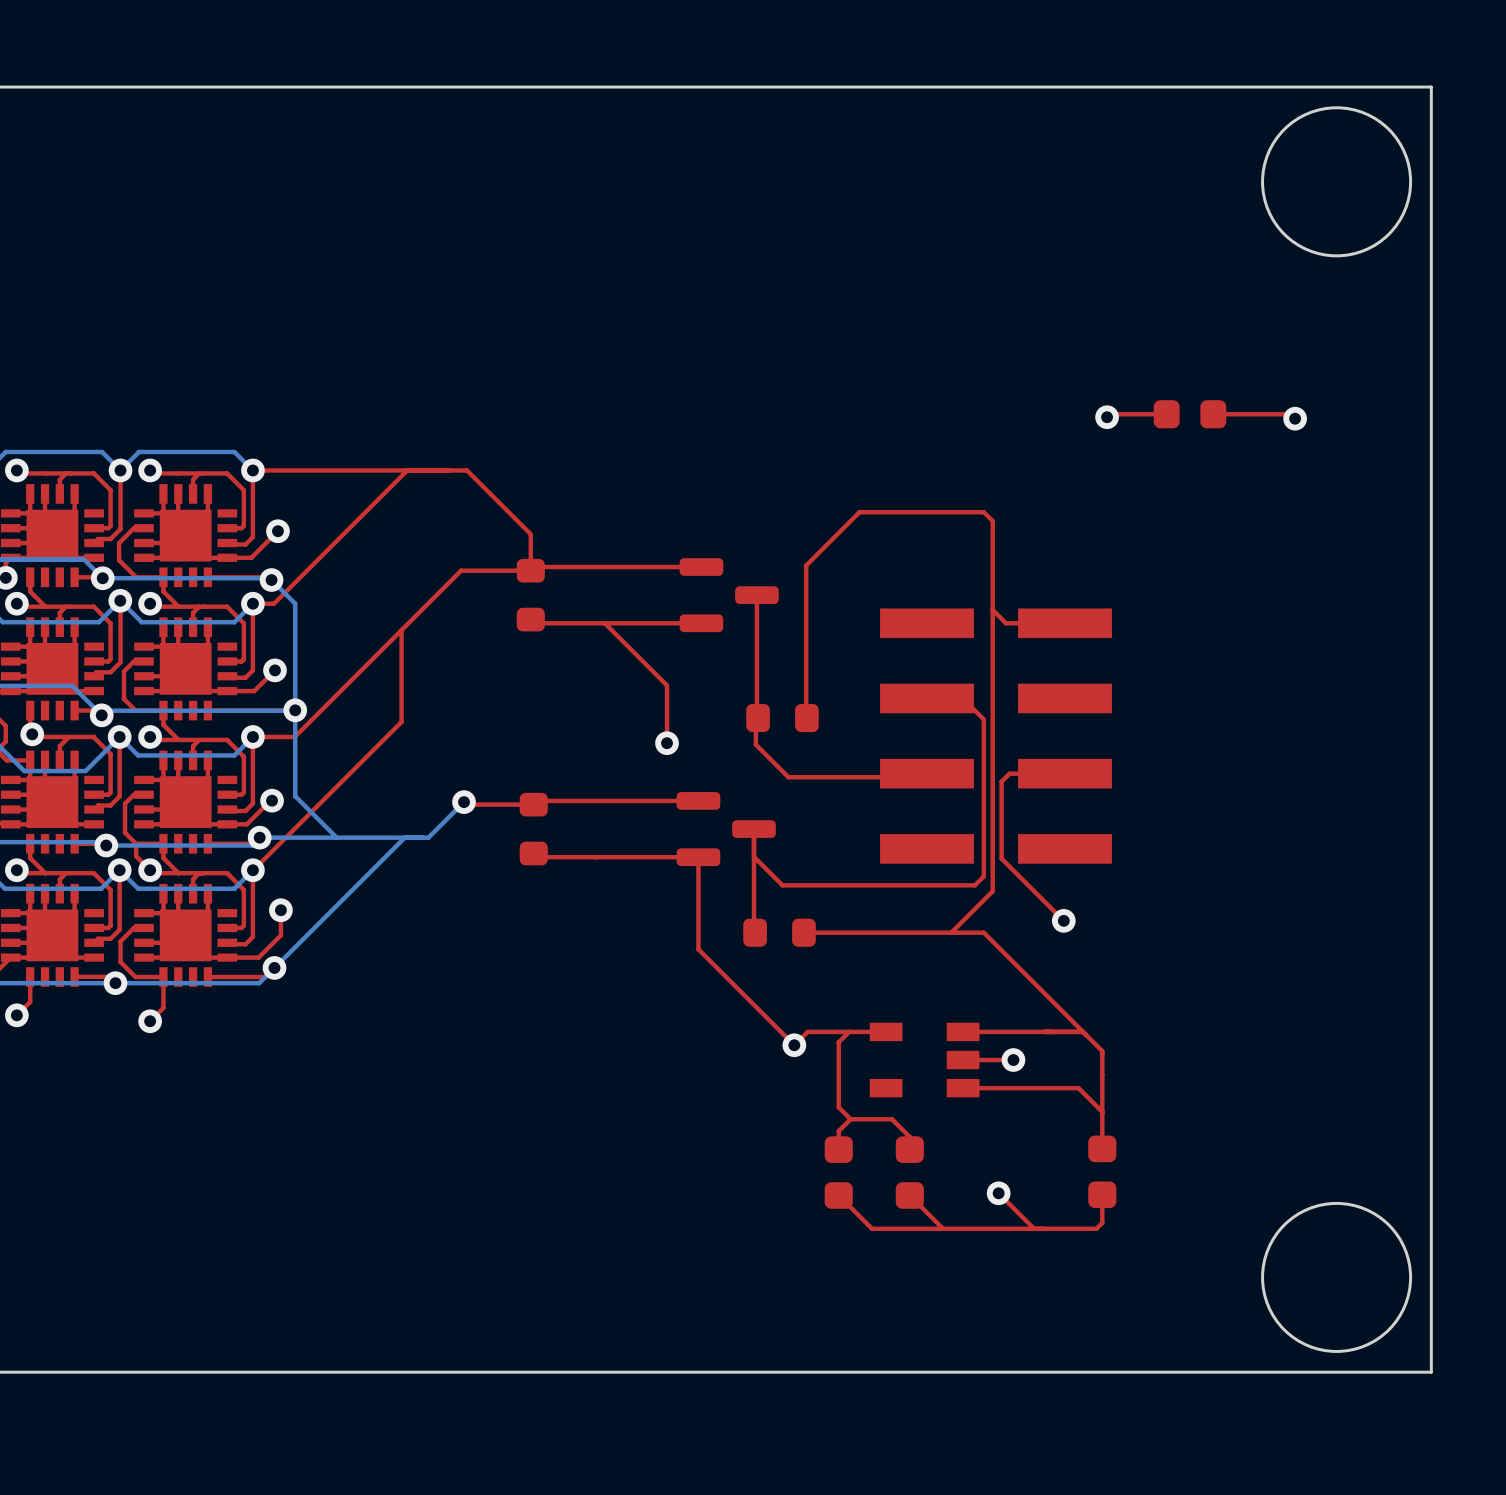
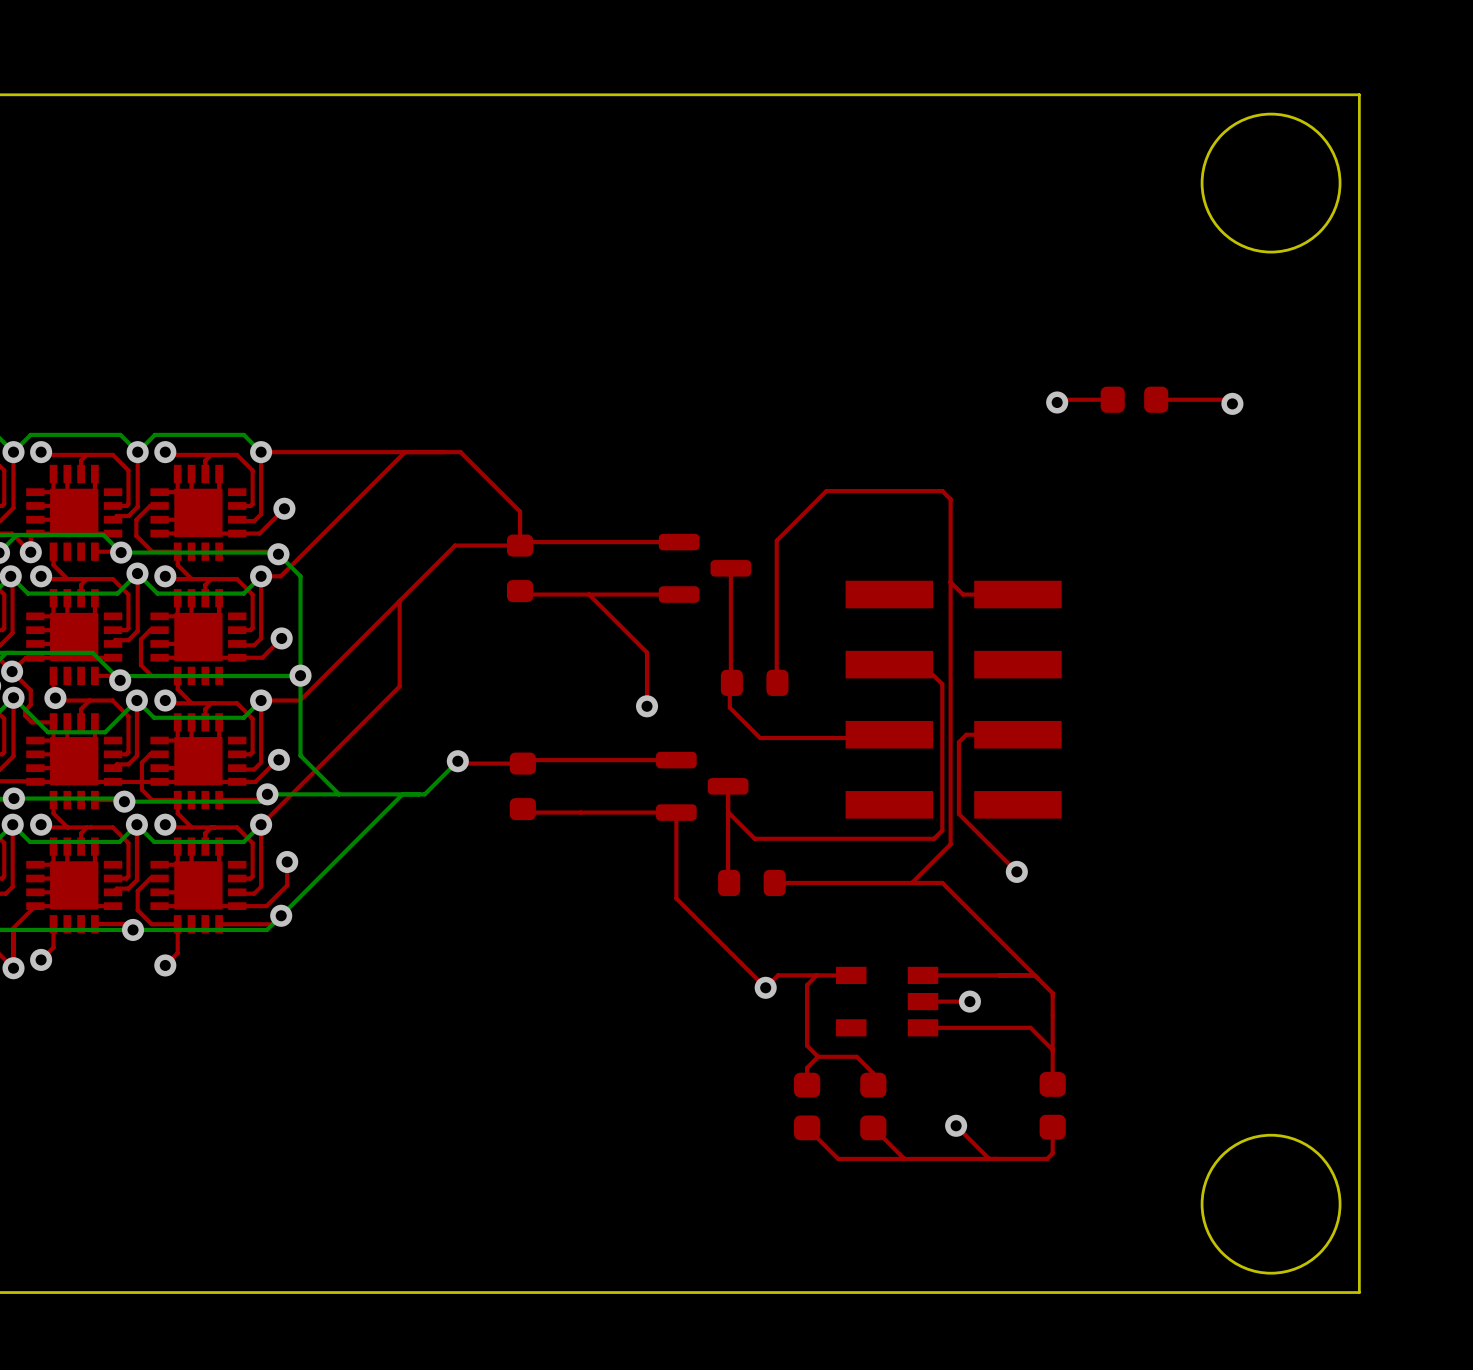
top track: none -> (159, 781) (113, 781)
top track: (136, 843) (136, 856) (150, 870) -> none

